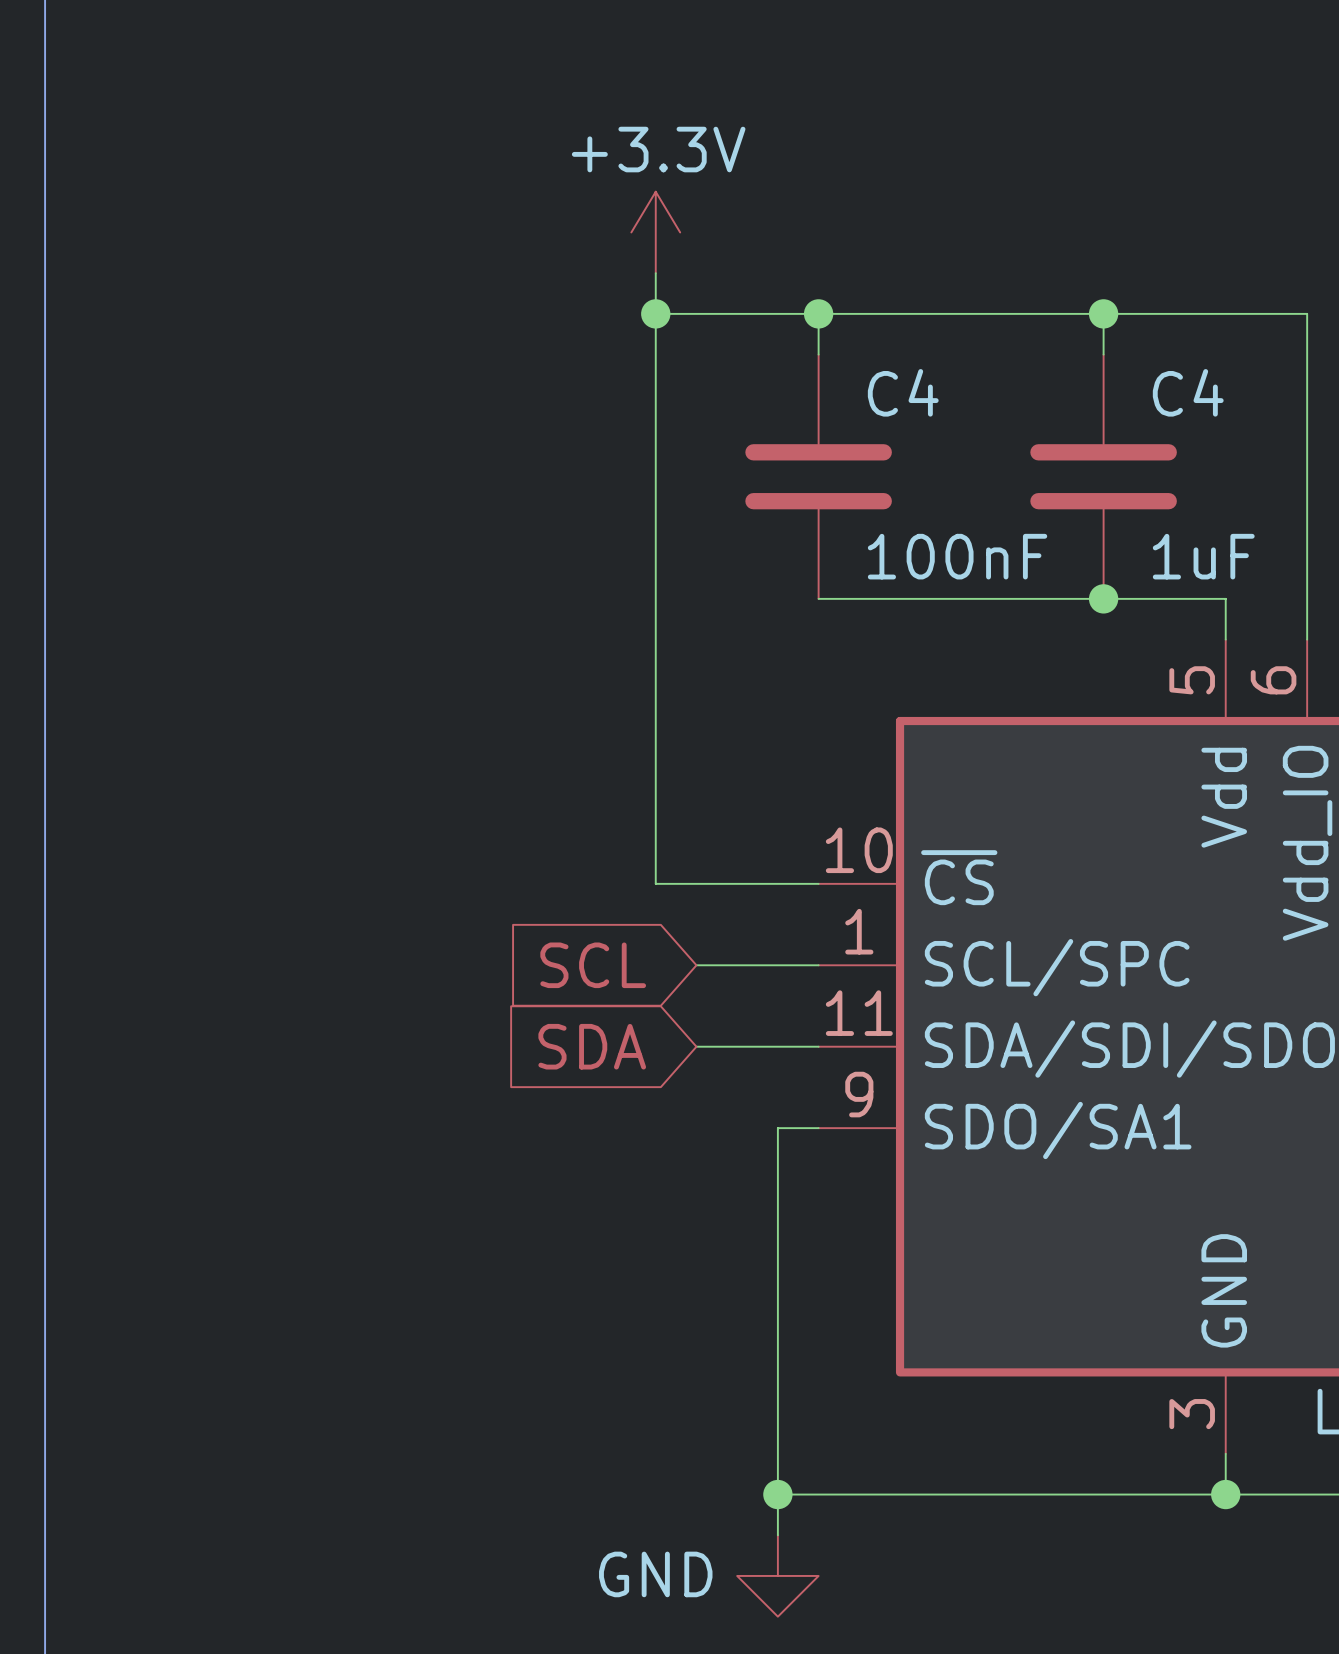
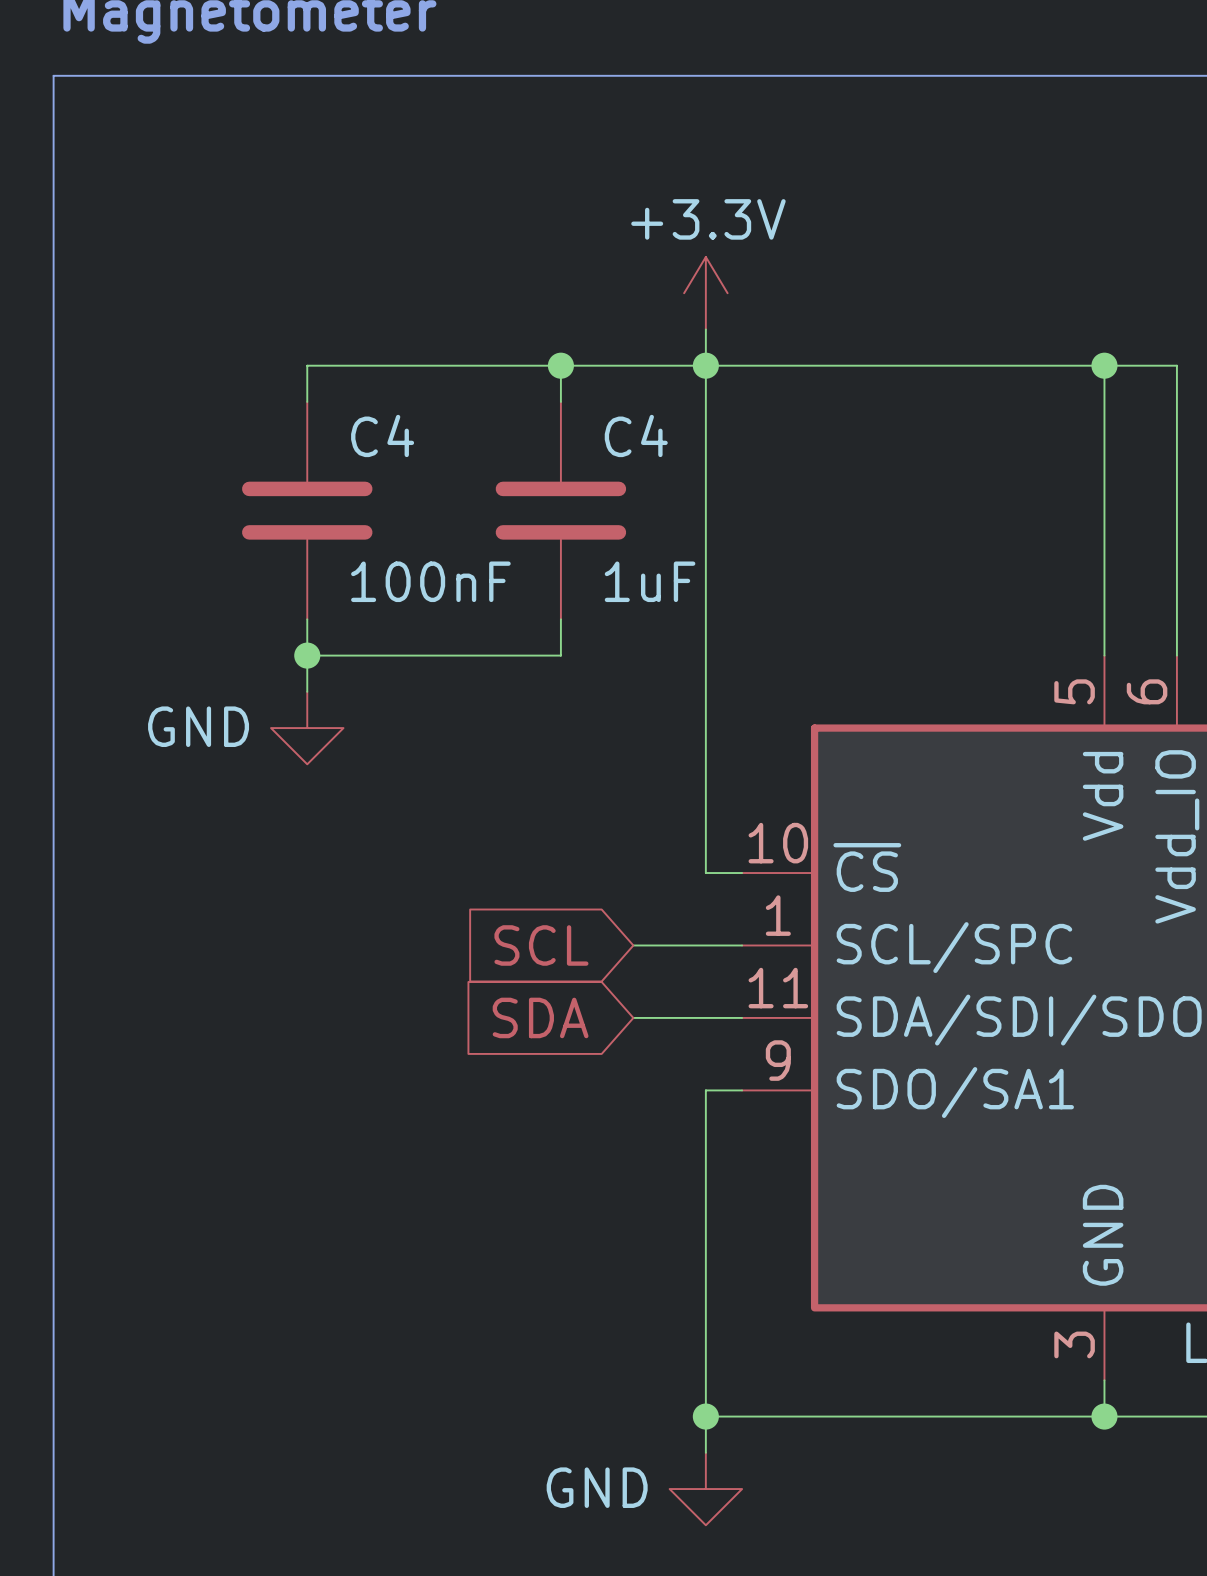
power symbol position: +3.3V (655, 232) -> +3.3V (705, 293)
wire: (655, 273) (655, 883) (777, 883) -> (705, 329) (705, 873)
wire: none -> (597, 365) (307, 365) (307, 401)
junction position: (655, 313) -> (560, 365)
wire: (818, 313) (818, 354) -> (560, 365) (560, 401)
junction position: (818, 313) -> (705, 365)
wire: (1103, 313) (1103, 354) -> none
junction position: (1103, 313) -> (1104, 365)
C4 position: (818, 476) -> (307, 510)
C4 position: (1103, 476) -> (560, 510)
wire: none -> (307, 619) (307, 691)
wire: none -> (560, 619) (560, 655) (307, 655)
wire: (818, 598) (1225, 598) -> (1104, 365) (1104, 619)
junction: (1103, 598) -> none
junction: none -> (307, 655)
power symbol: none -> GND (307, 728)

